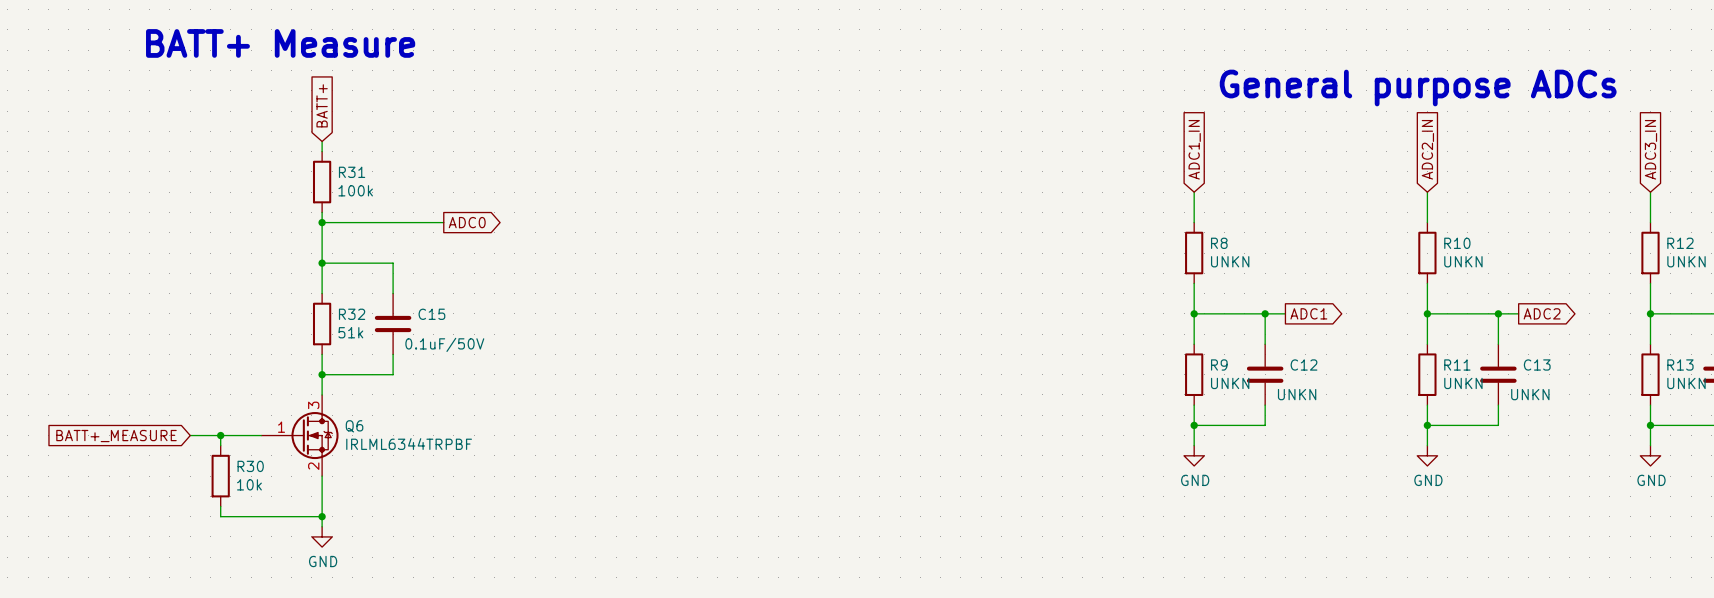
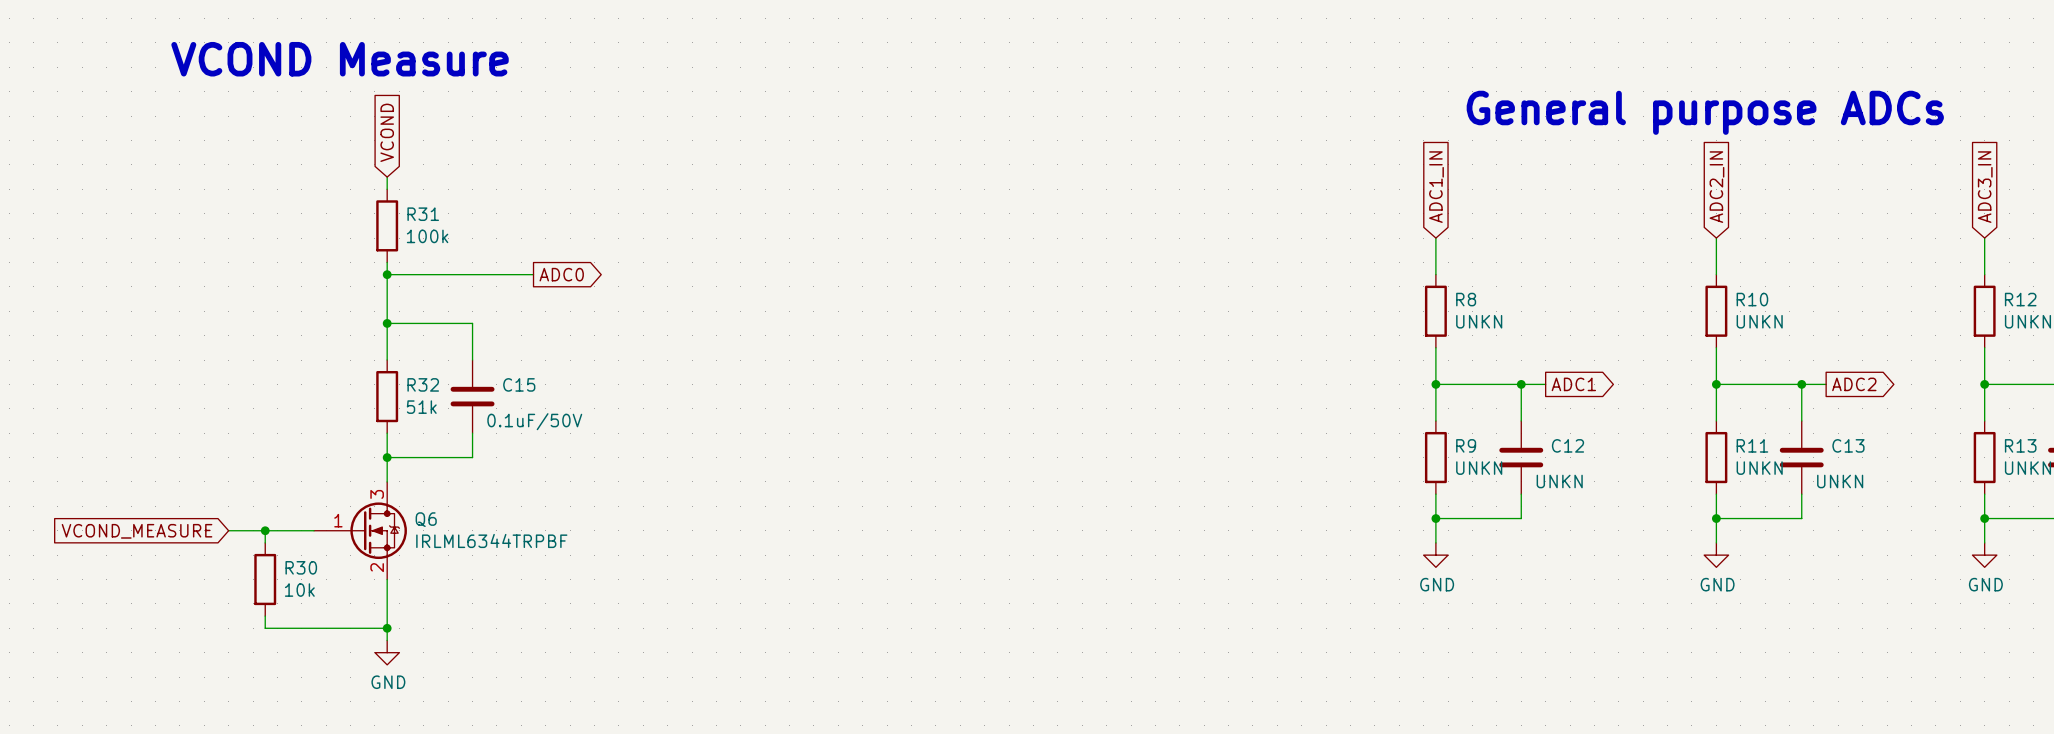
text: BATT+ Measure (280, 43) -> VCOND Measure (340, 59)
global label: BATT+ (322, 105) -> VCOND (387, 132)
global label: BATT+_MEASURE (116, 436) -> VCOND_MEASURE (137, 531)

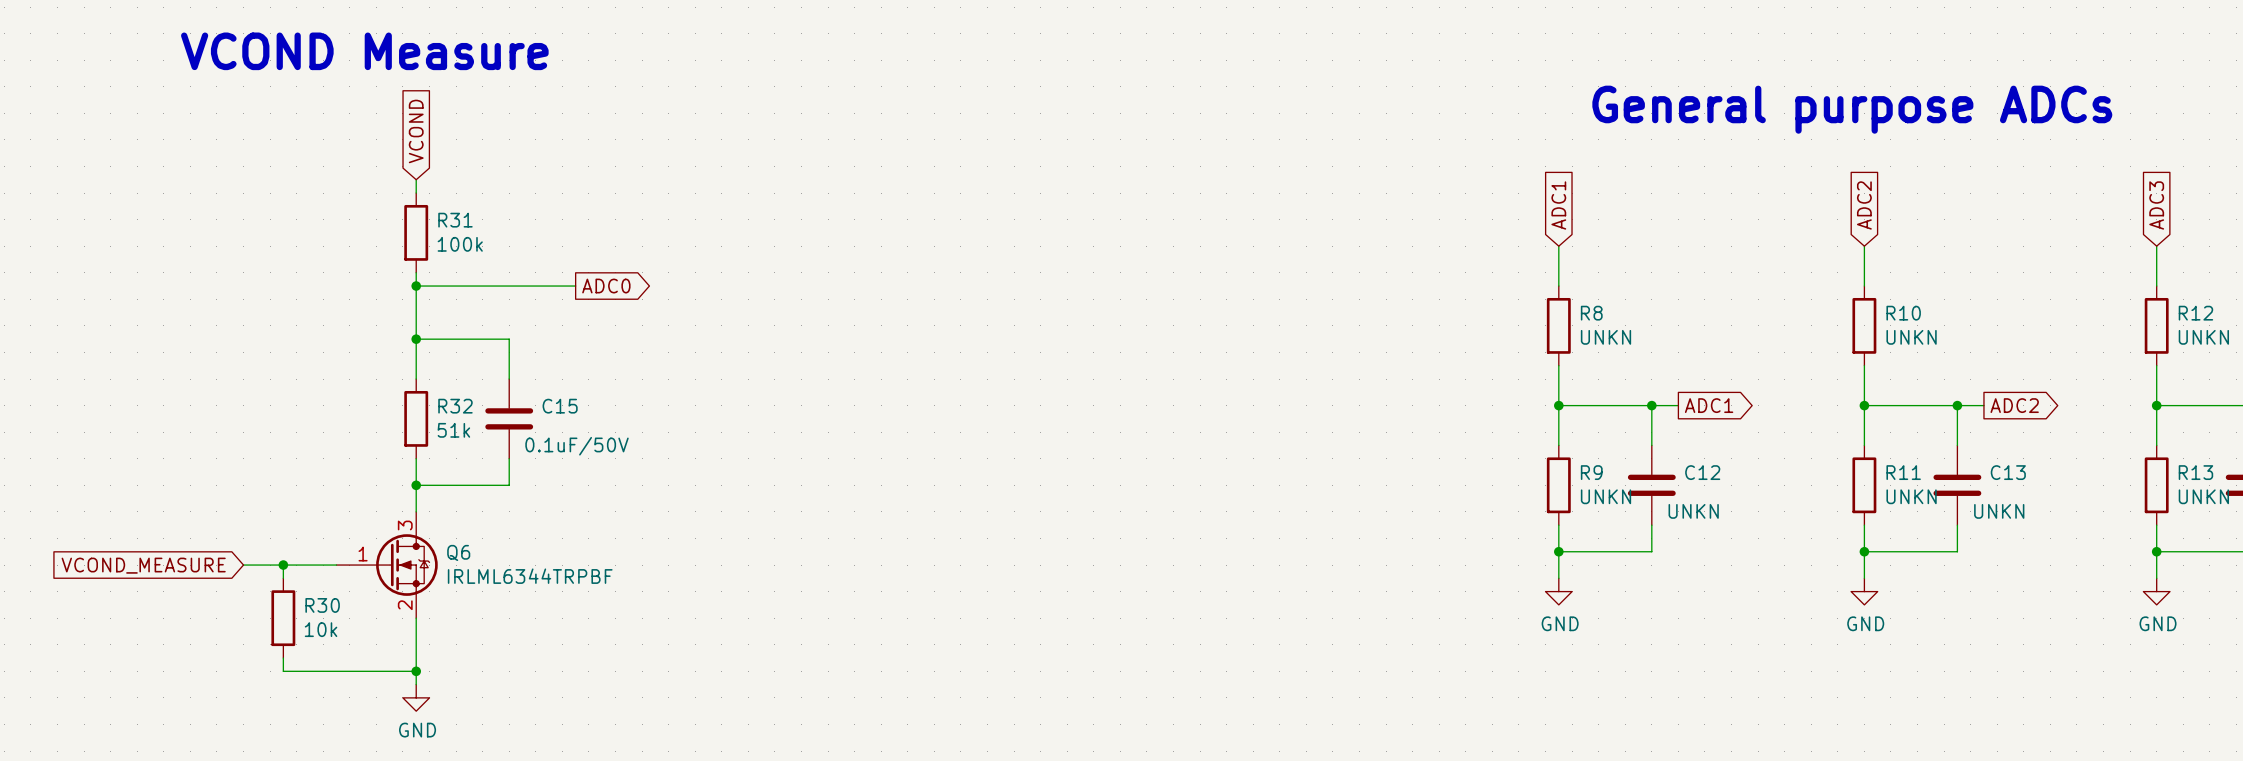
global label: ADC1_IN (1436, 187) -> ADC1 (1558, 205)
global label: ADC2_IN (1716, 187) -> ADC2 (1864, 205)
global label: ADC3_IN (1985, 187) -> ADC3 (2156, 205)

